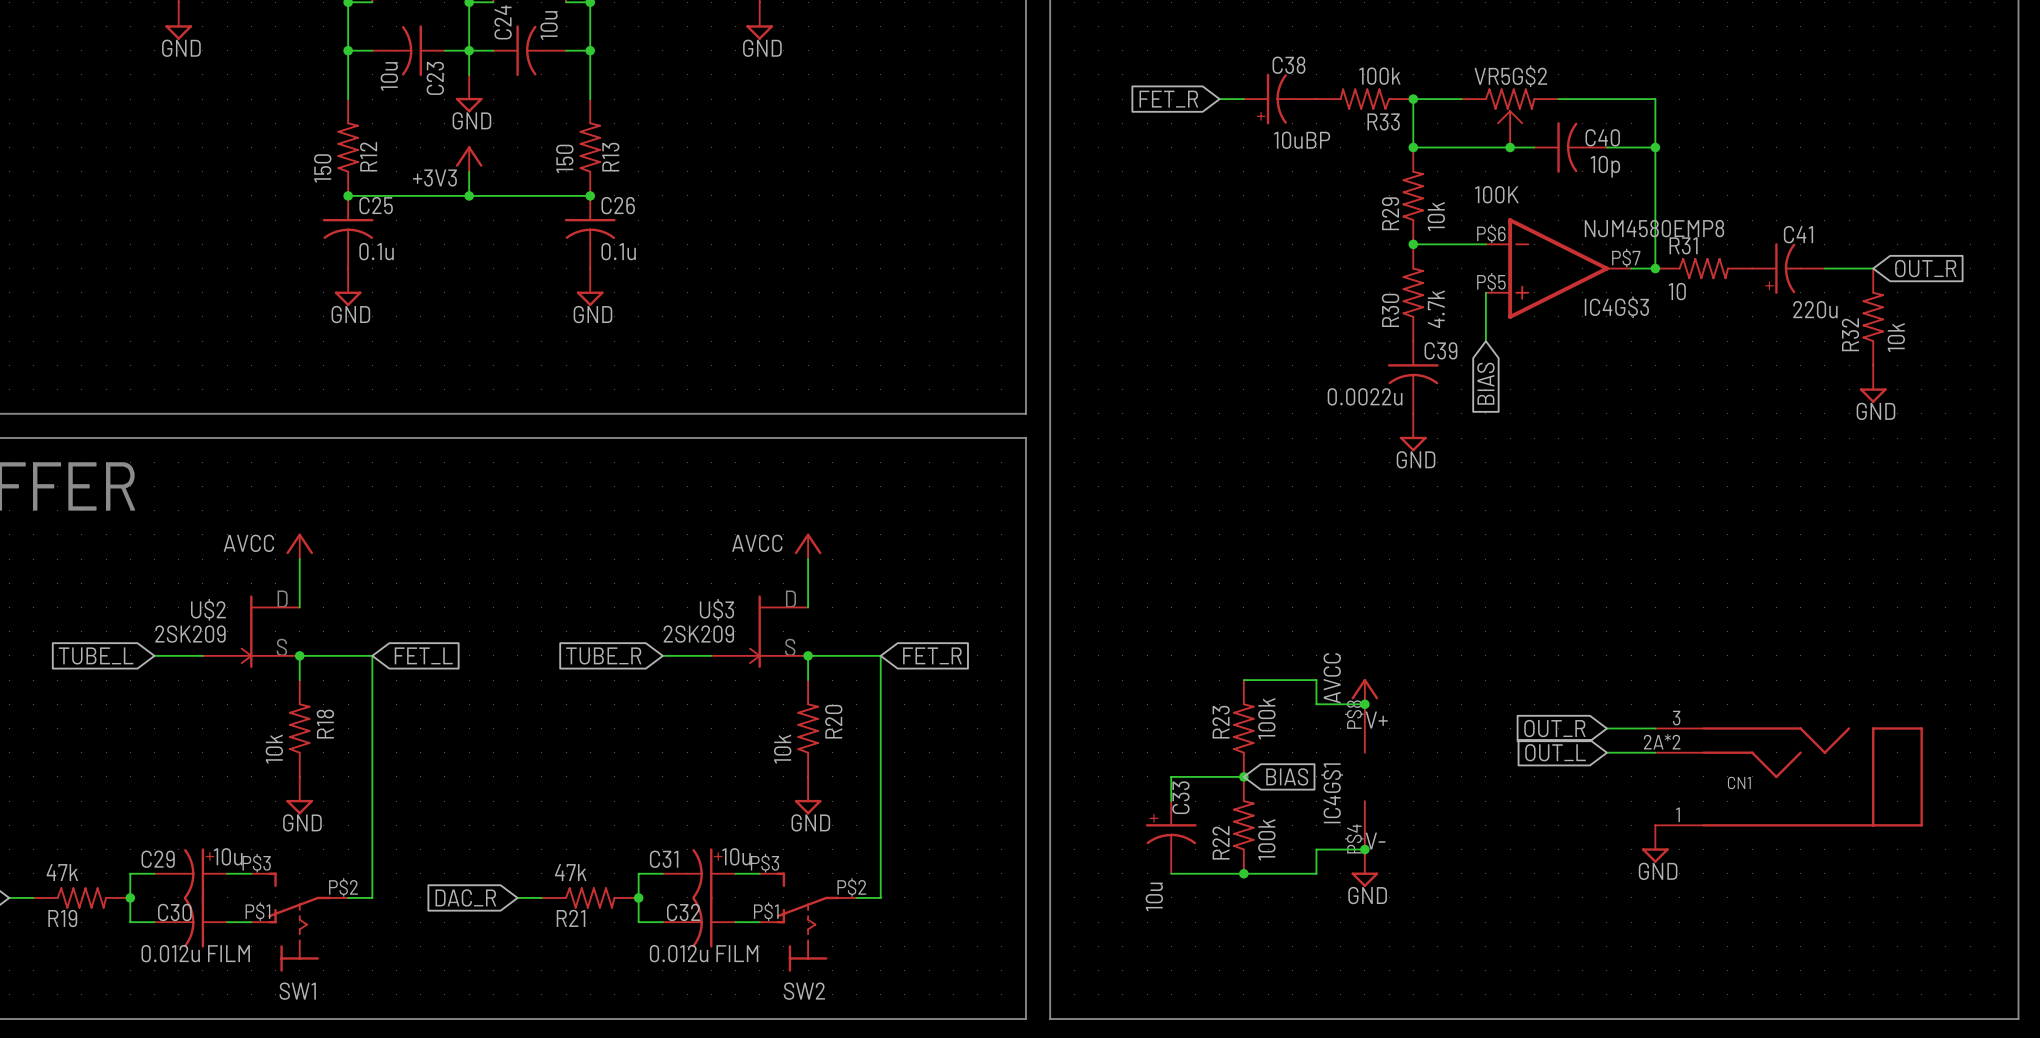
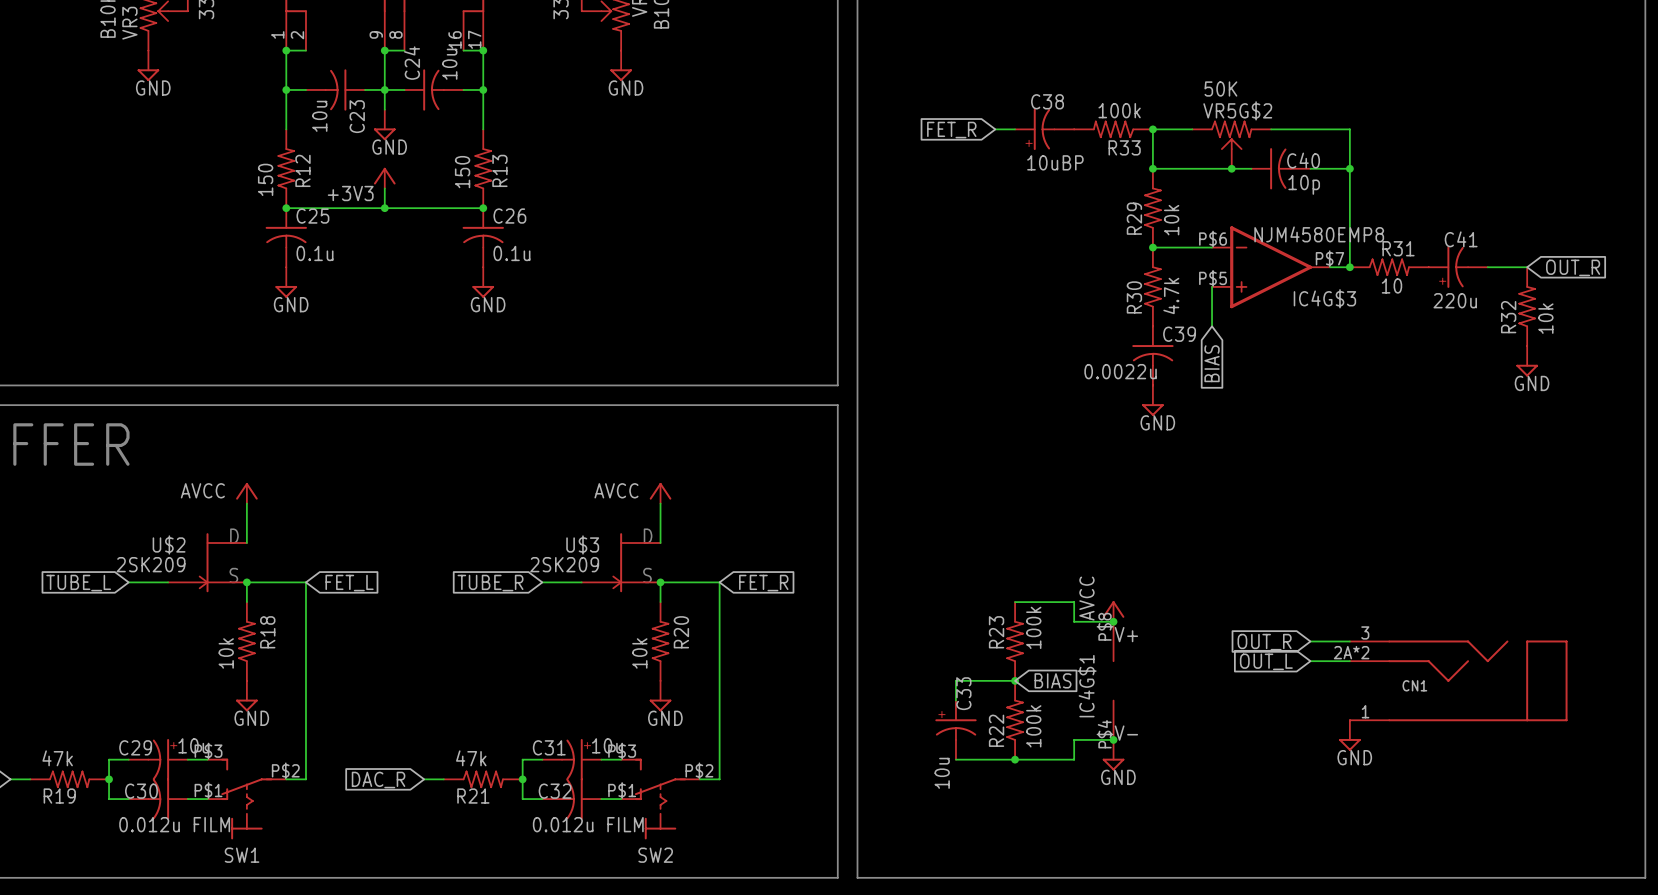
VR5G$2 value: 100K (1496, 194) -> 50K (1220, 89)
IC4G$3 value position: NJM4580EMP8 (1654, 228) -> NJM4580EMP8 (1319, 234)
R31 name position: R31 (1683, 245) -> R31 (1398, 248)
R31 value position: 10 (1677, 291) -> 10 (1391, 285)
C41 value position: 220u (1815, 309) -> 220u (1455, 300)

